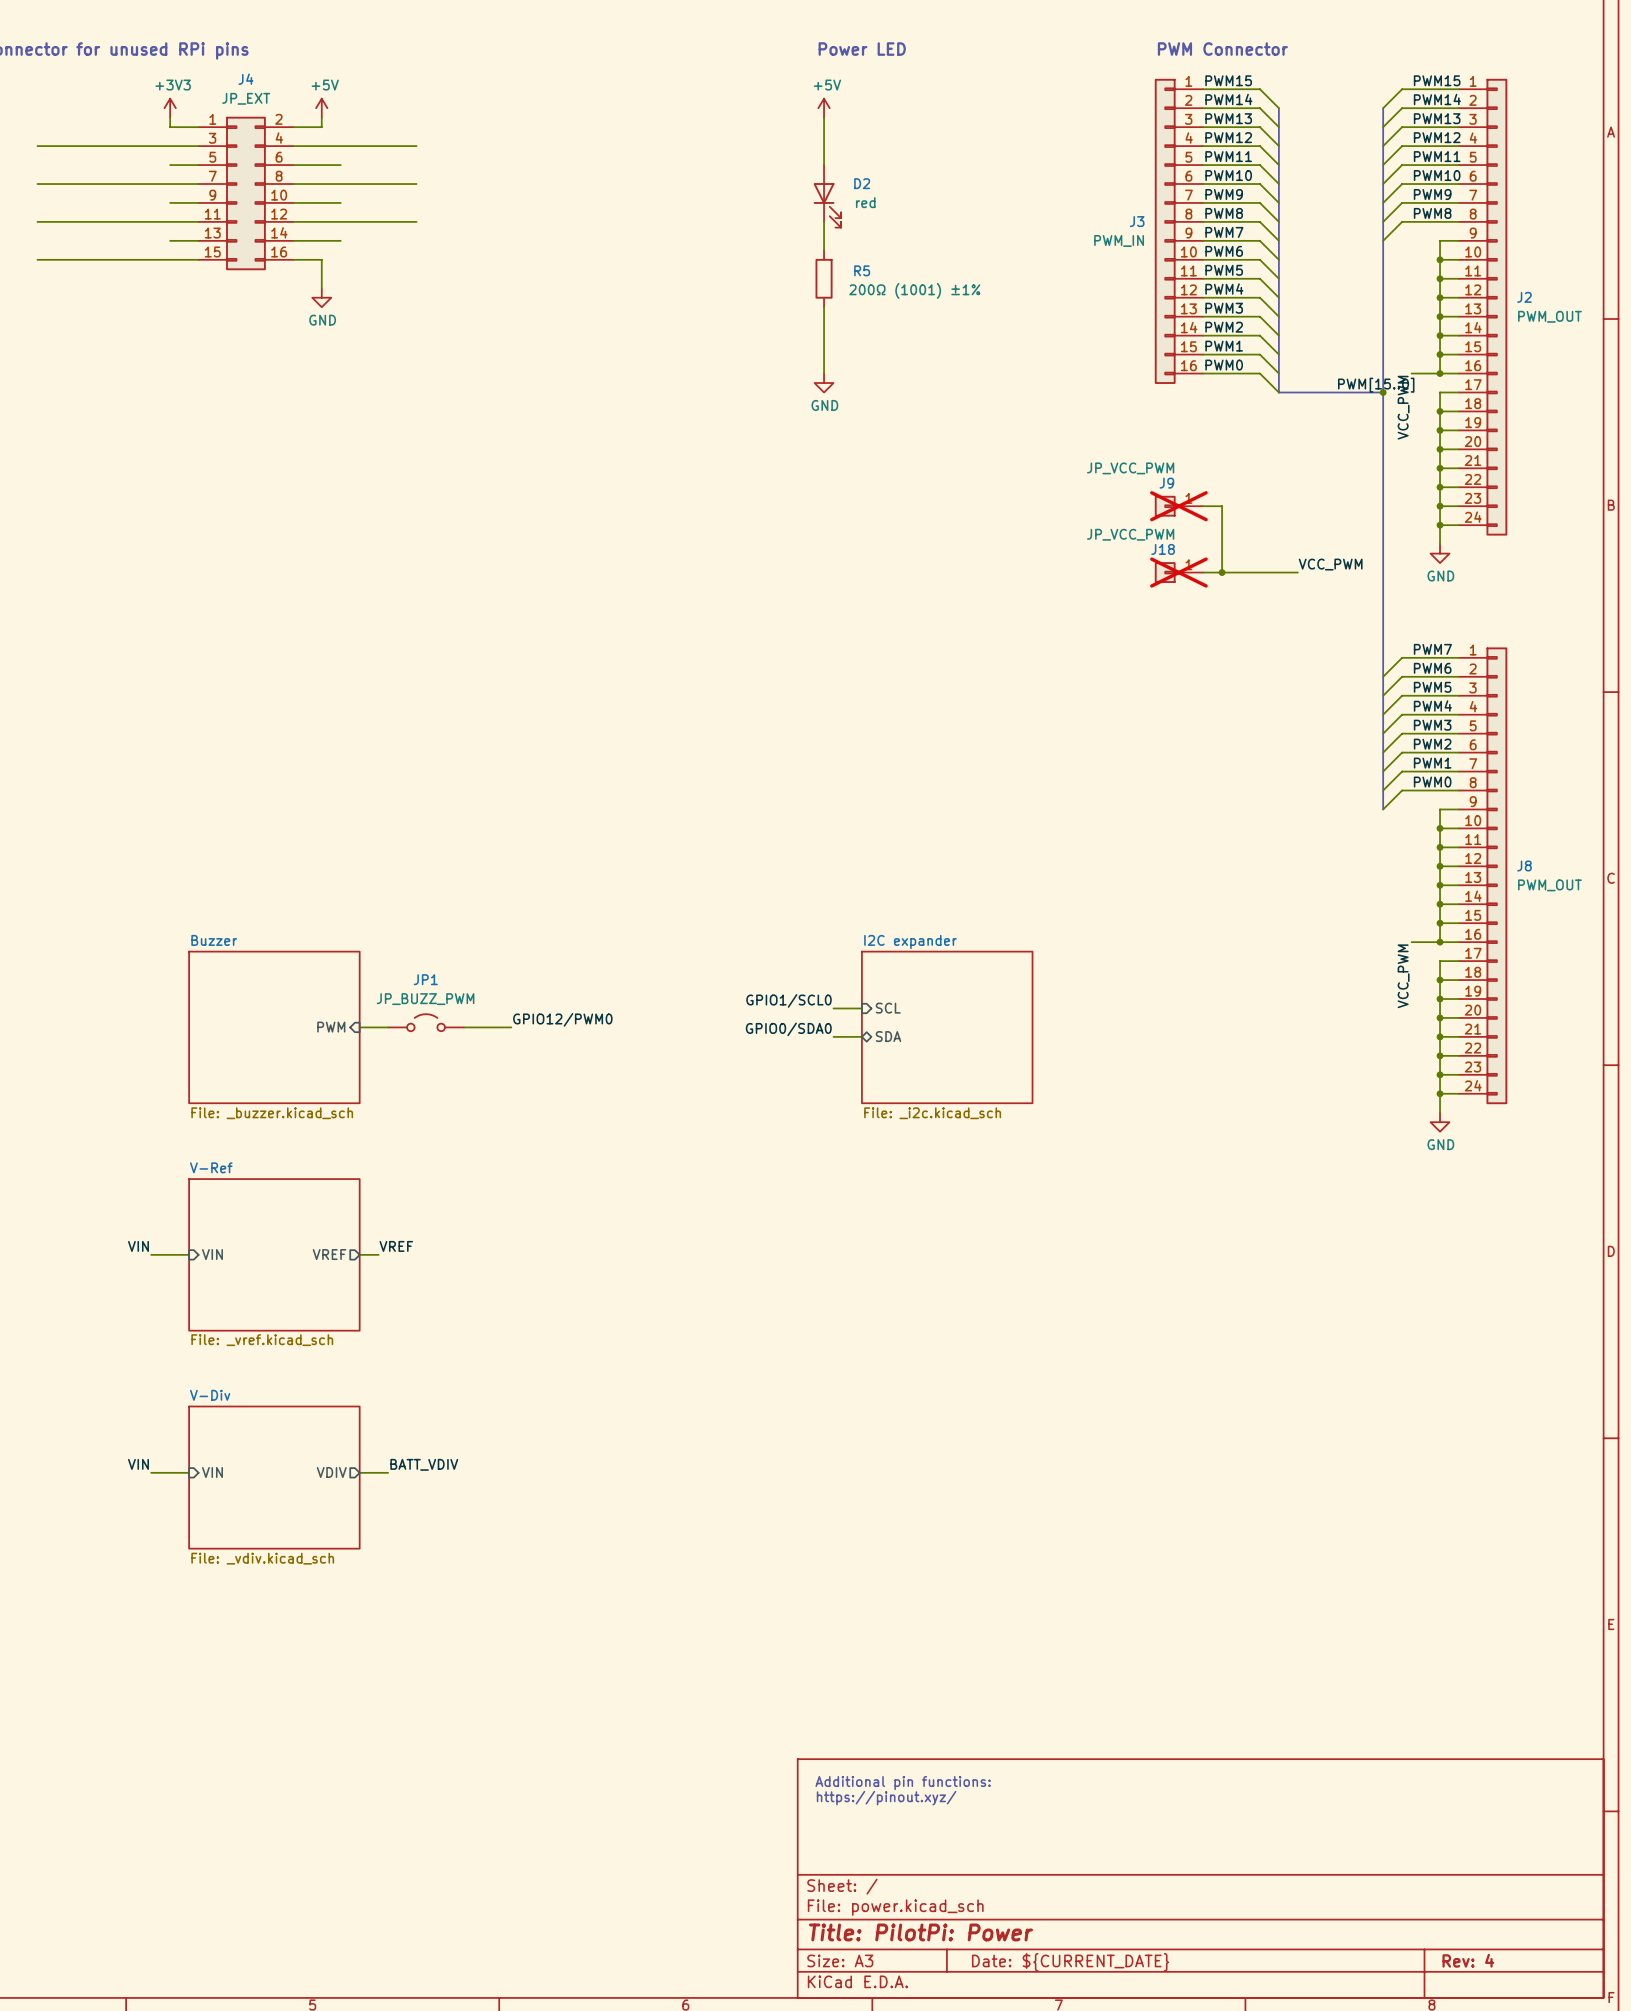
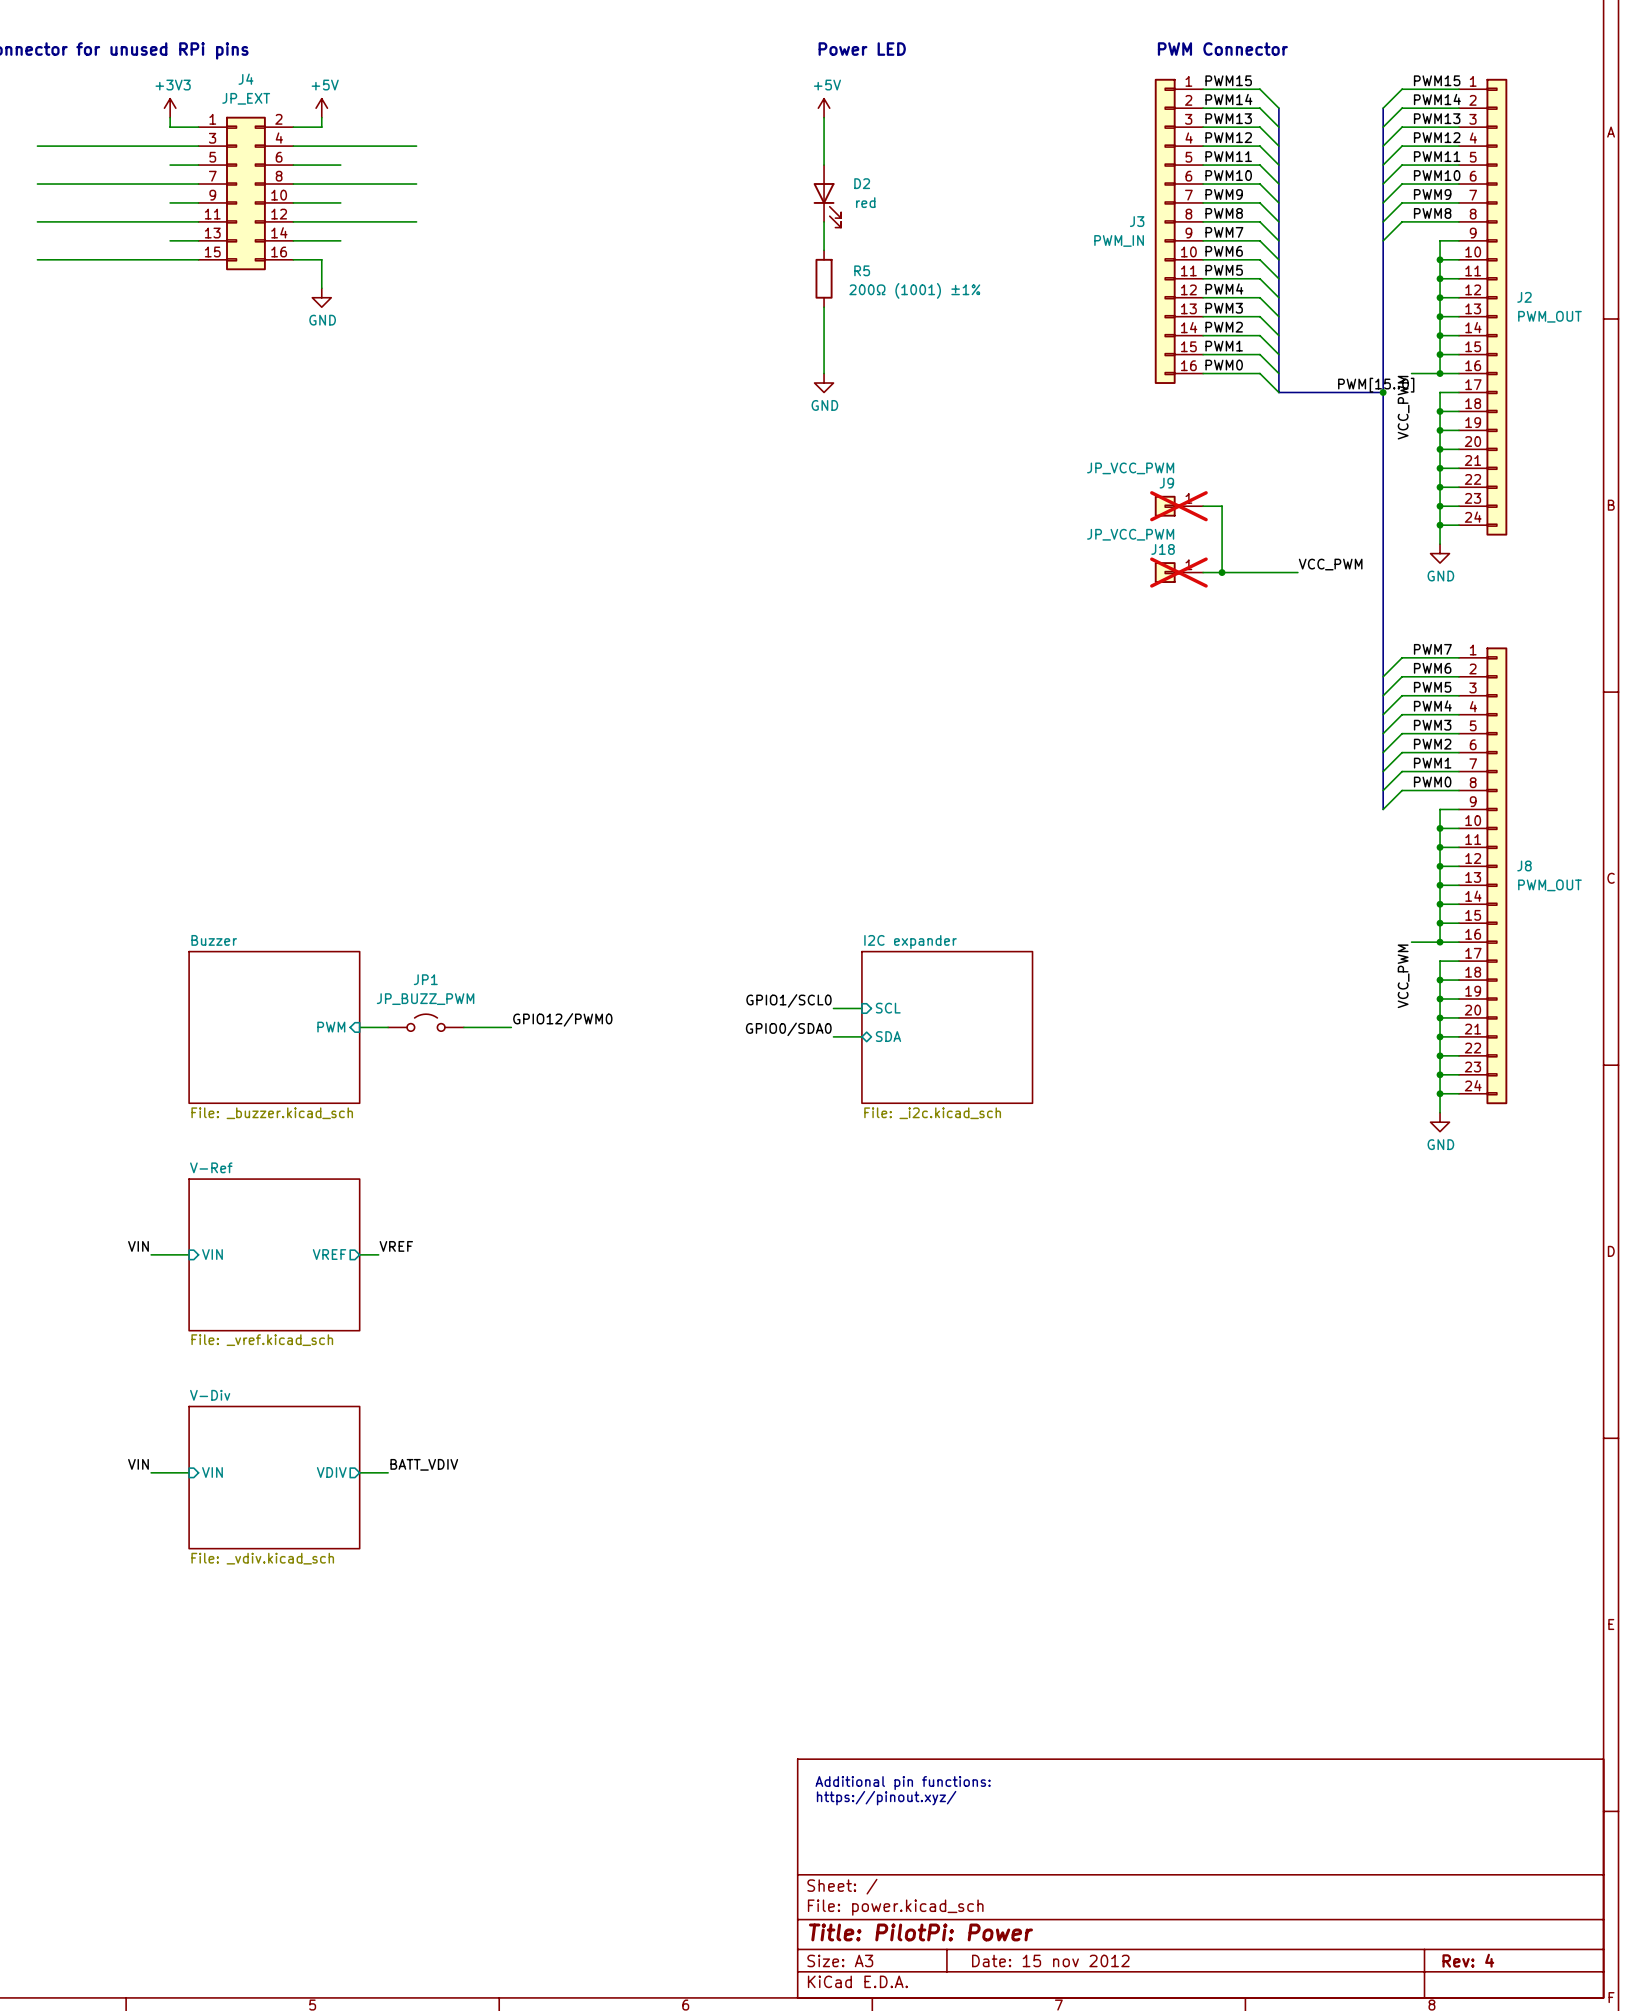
title block: Date: ${CURRENT_DATE} (1070, 1962) -> Date: 15 nov 2012 (1050, 1960)

